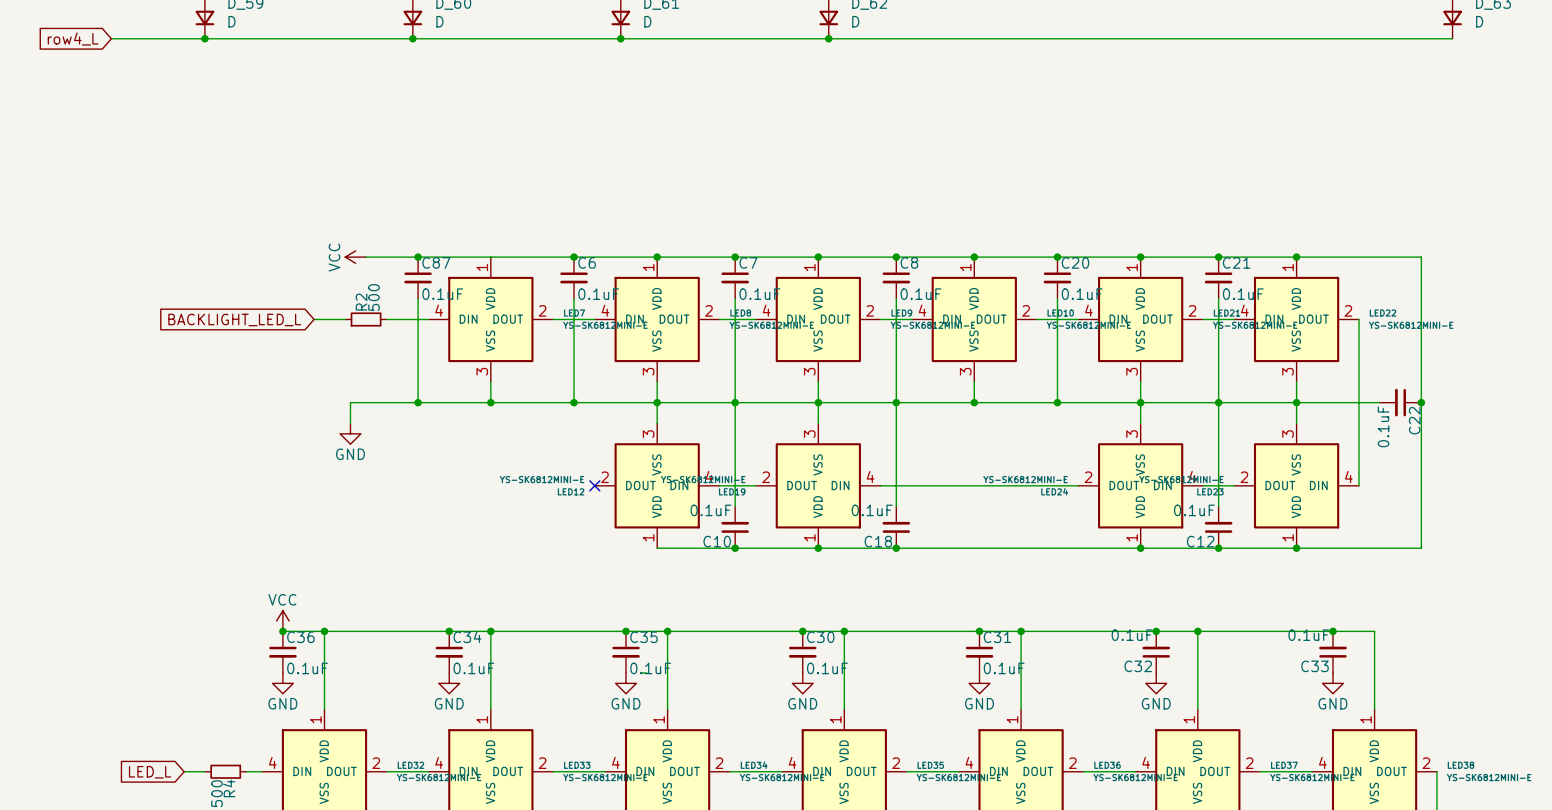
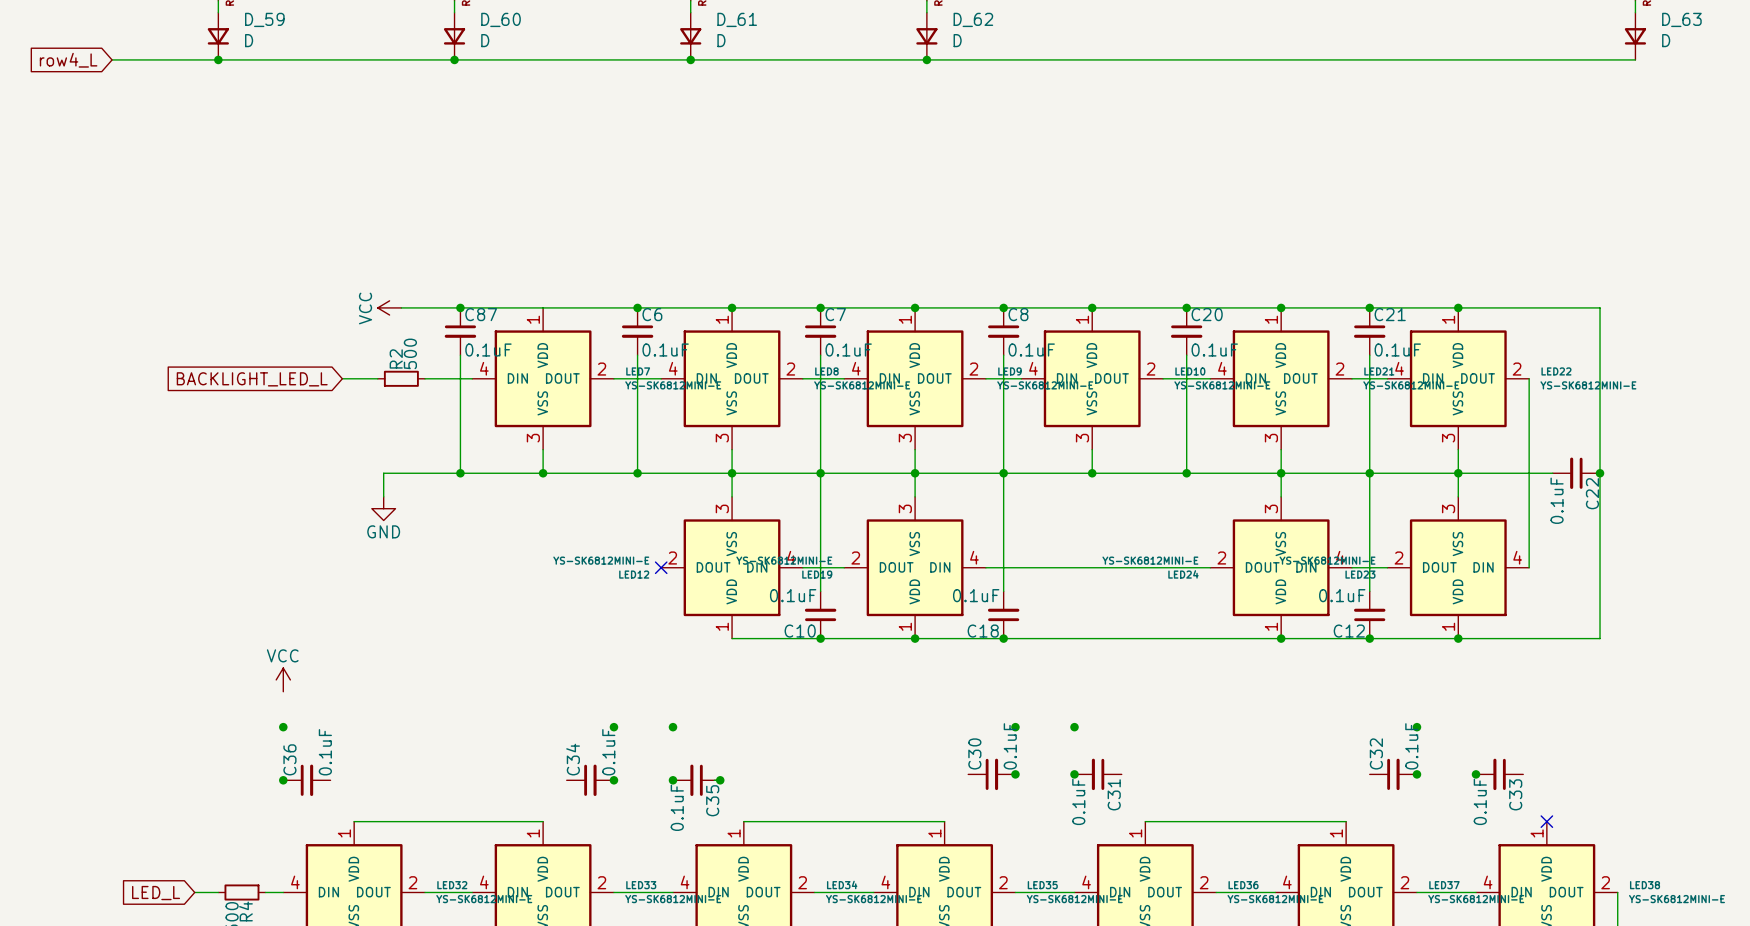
power symbol position: VCC (282, 620) -> VCC (283, 679)
junction: none -> (613, 727)
junction: none -> (1015, 727)
junction: none -> (1074, 727)
junction: none -> (1416, 727)
wire: (282, 631) (1374, 631) (1374, 709) -> none
junction position: (282, 631) -> (283, 727)
wire: (324, 631) (324, 709) -> (543, 821) (354, 821)
junction: (324, 631) -> none
junction: (449, 631) -> none
wire: (490, 631) (490, 709) -> none
junction: (490, 631) -> none
junction position: (626, 631) -> (673, 727)
wire: (667, 631) (667, 709) -> (944, 821) (743, 821)
junction: (667, 631) -> none
junction: (802, 631) -> none
wire: (844, 631) (844, 709) -> none
junction: (844, 631) -> none
junction: (979, 631) -> none
wire: (1021, 631) (1021, 709) -> (1346, 821) (1145, 821)
junction: (1021, 631) -> none
junction: (1156, 631) -> none
wire: (1197, 631) (1197, 709) -> none
junction: (1197, 631) -> none
junction: (1332, 631) -> none
C36 rotation: 0° (282, 652) -> 90° counterclockwise (306, 780)
C34 rotation: 0° (449, 652) -> 90° counterclockwise (590, 780)
C34 position: (449, 652) -> (590, 780)
C35 rotation: 0° (626, 652) -> 90° clockwise (696, 780)
C30 rotation: 0° (802, 652) -> 90° counterclockwise (991, 774)
C30 position: (802, 652) -> (991, 774)
C31 rotation: 0° (979, 652) -> 90° clockwise (1098, 774)
C32 rotation: 0° (1156, 652) -> 90° clockwise (1393, 774)
C32 position: (1156, 652) -> (1393, 774)
C33 rotation: 0° (1332, 652) -> 90° counterclockwise (1499, 774)
junction: none -> (1015, 774)
junction: none -> (1074, 774)
junction: none -> (1416, 774)
junction: none -> (1476, 774)
junction: none -> (283, 780)
junction: none -> (613, 780)
junction: none -> (673, 780)
junction: none -> (720, 780)
power symbol: GND (282, 683) -> none
power symbol: GND (449, 683) -> none
power symbol: GND (626, 683) -> none
power symbol: GND (802, 683) -> none
power symbol: GND (979, 683) -> none
power symbol: GND (1156, 683) -> none
power symbol: GND (1332, 683) -> none
no-connect mark: none -> (1546, 821)

